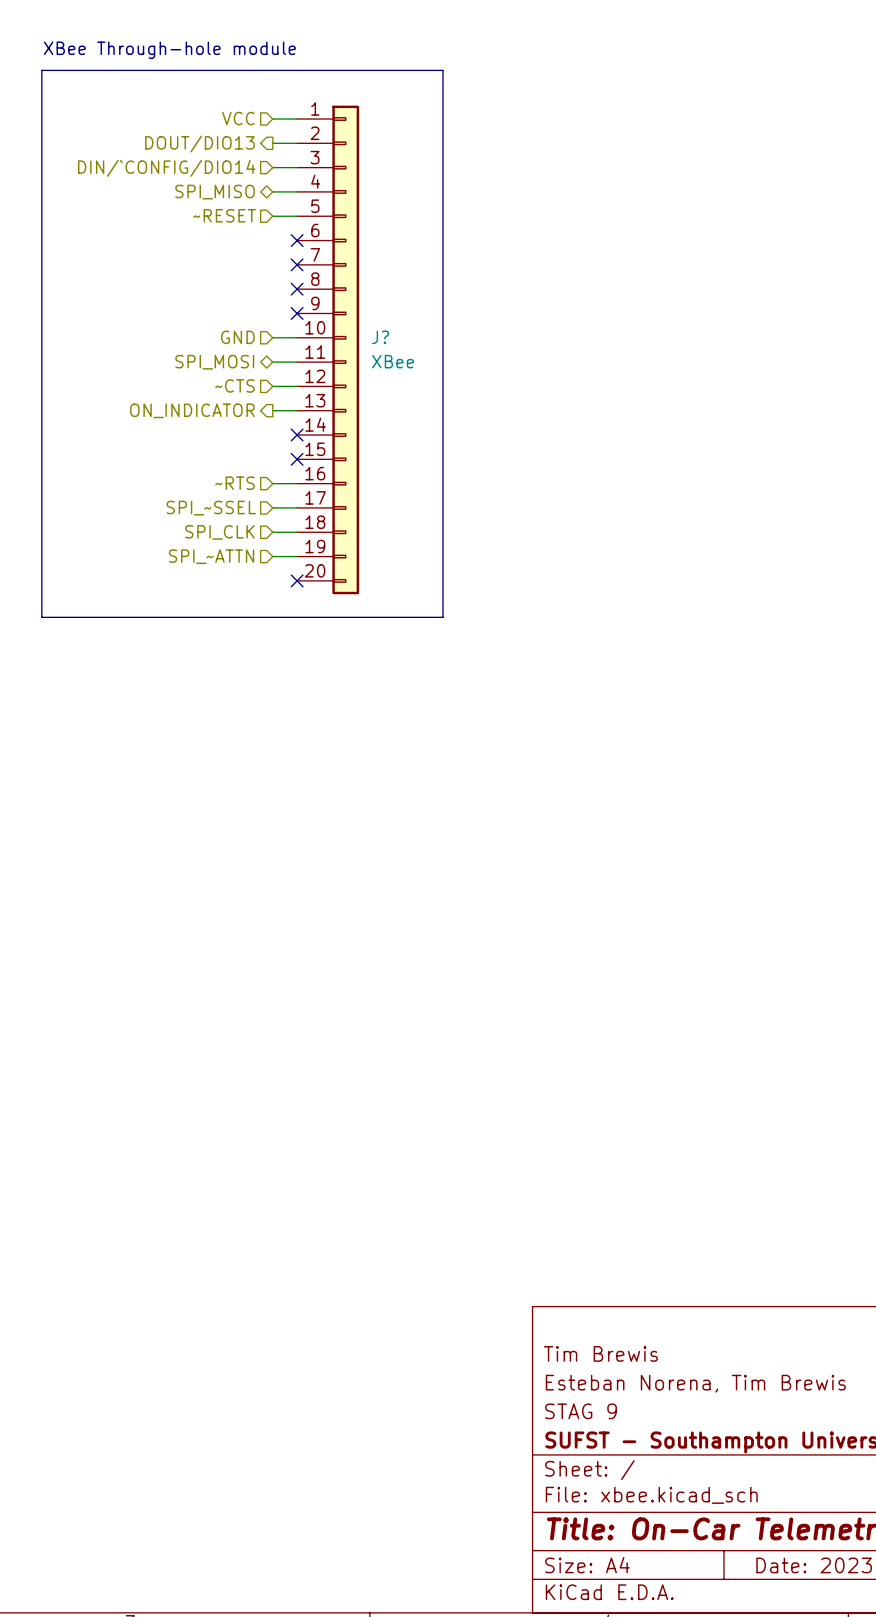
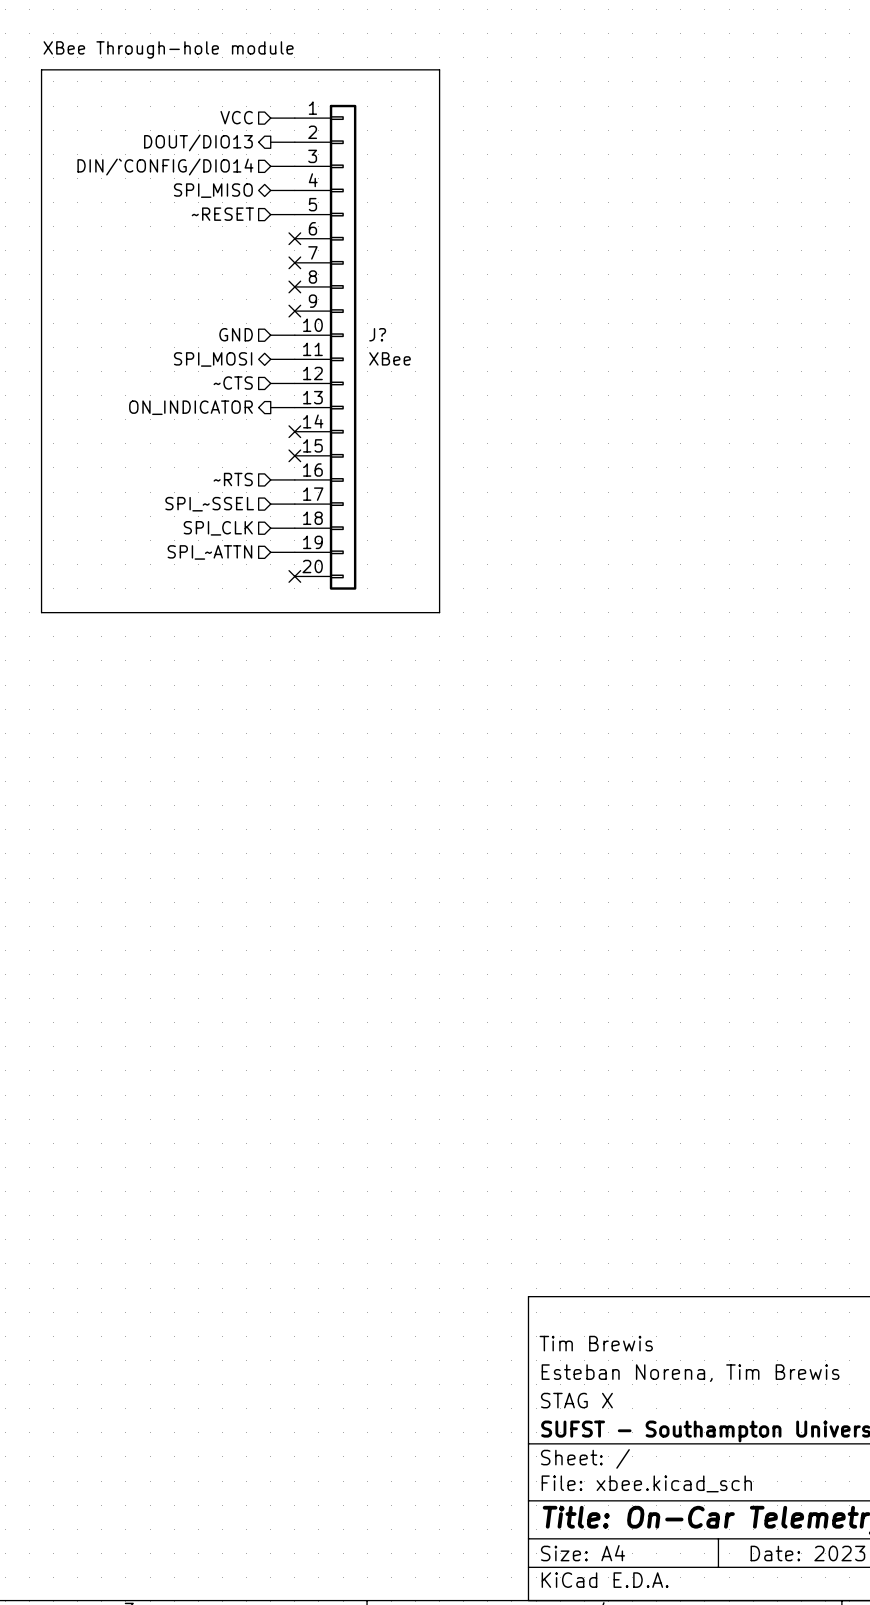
title block: STAG 9 (581, 1411) -> STAG X (576, 1400)

